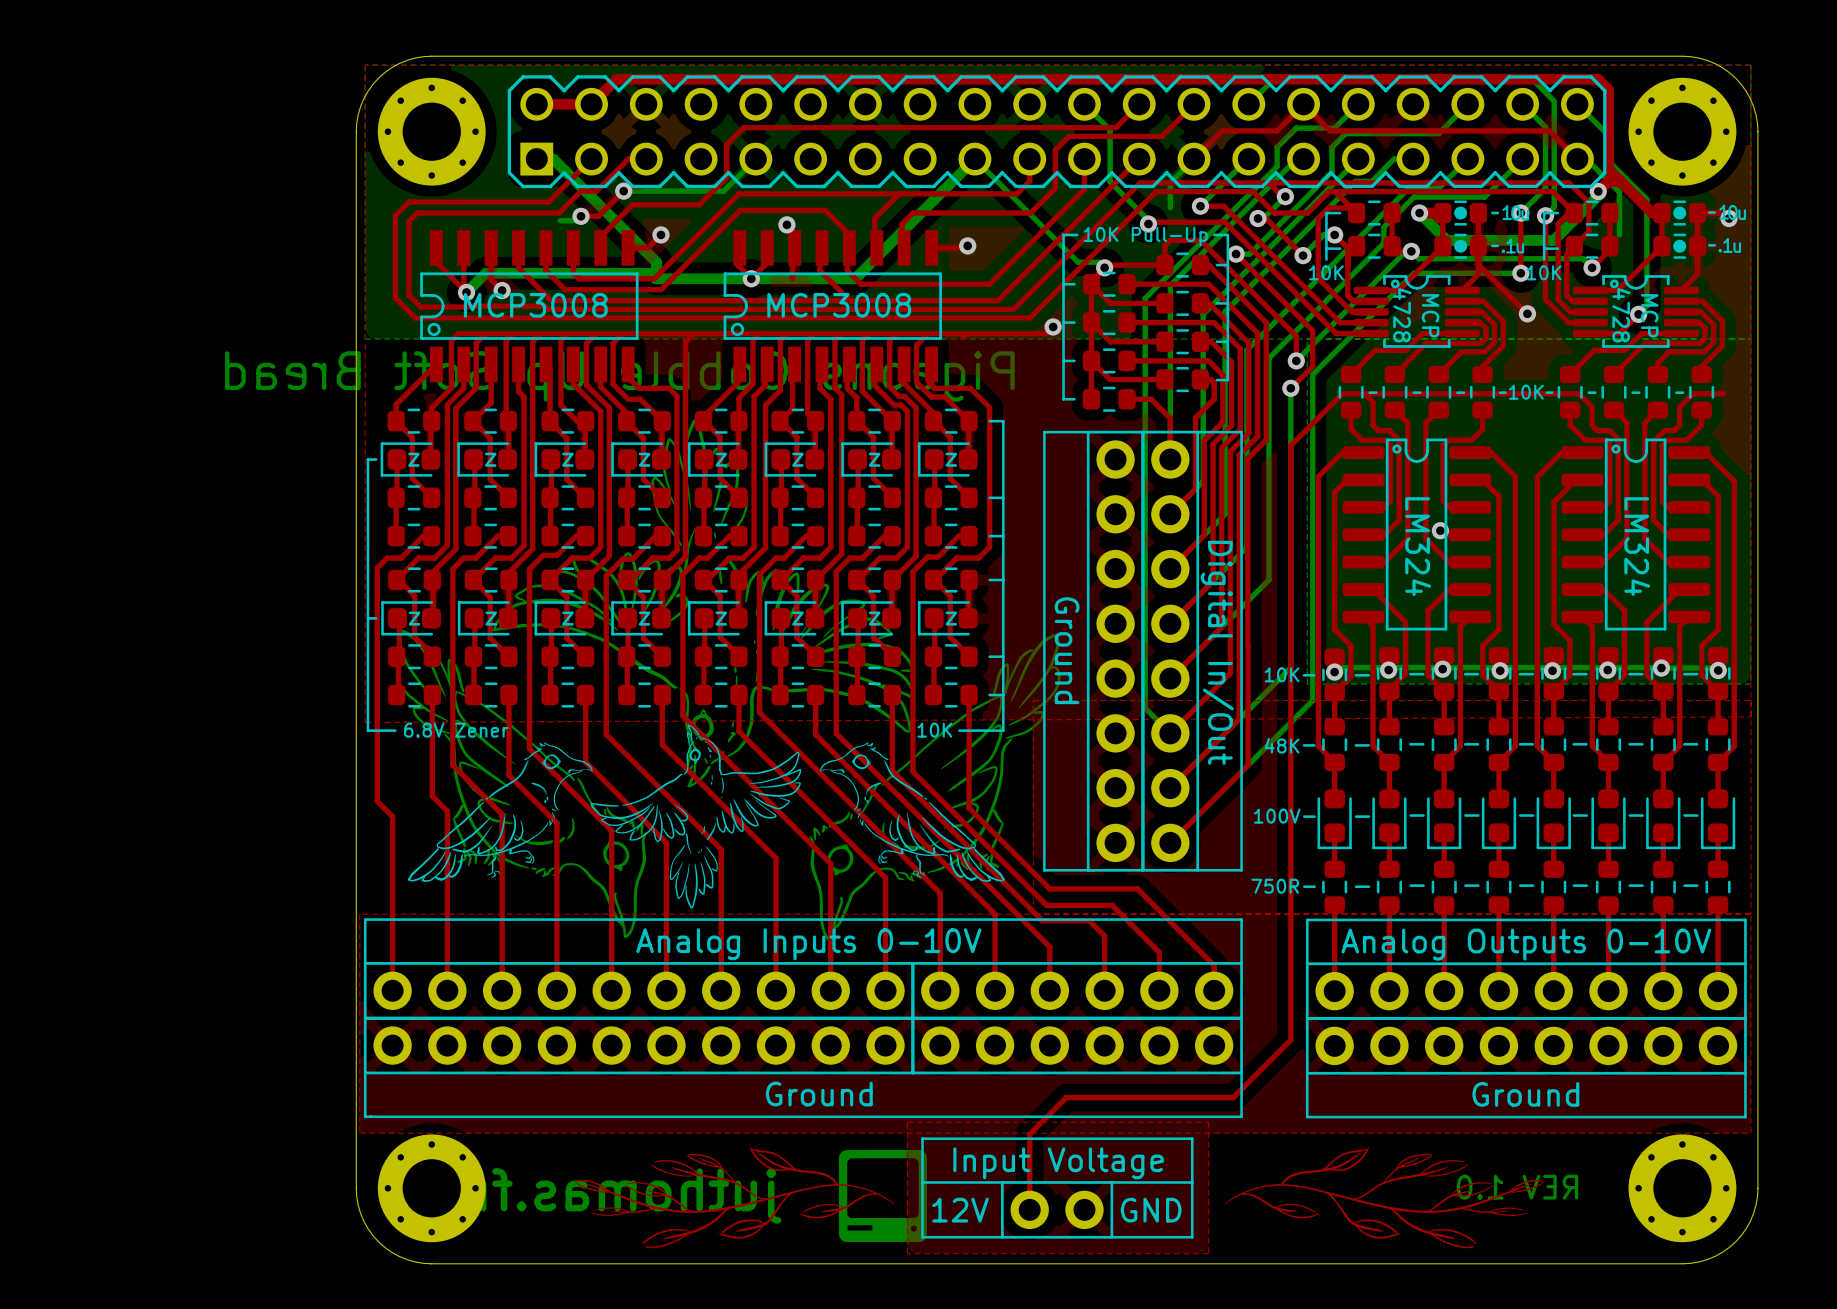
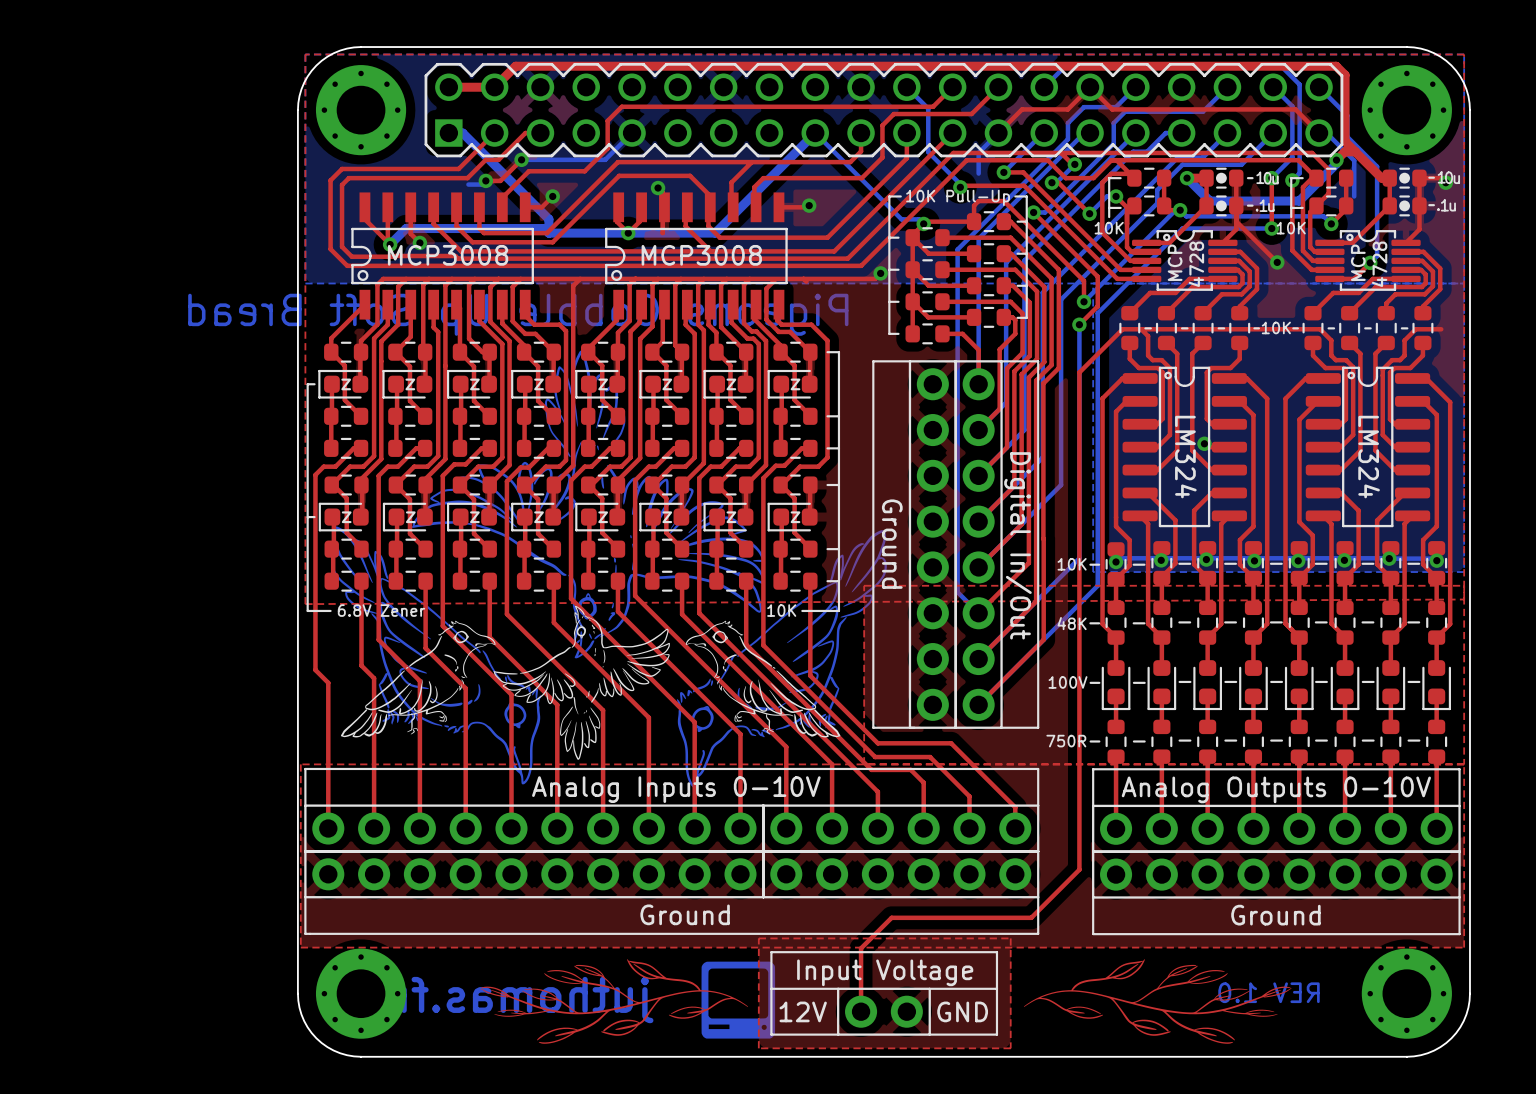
part text rotation: 0° (1402, 315) -> 180° (1196, 264)
part text rotation: 0° (1430, 315) -> 180° (1175, 262)
part text rotation: 0° (1621, 315) -> 180° (1379, 264)
part text rotation: 0° (1649, 315) -> 180° (1358, 262)

